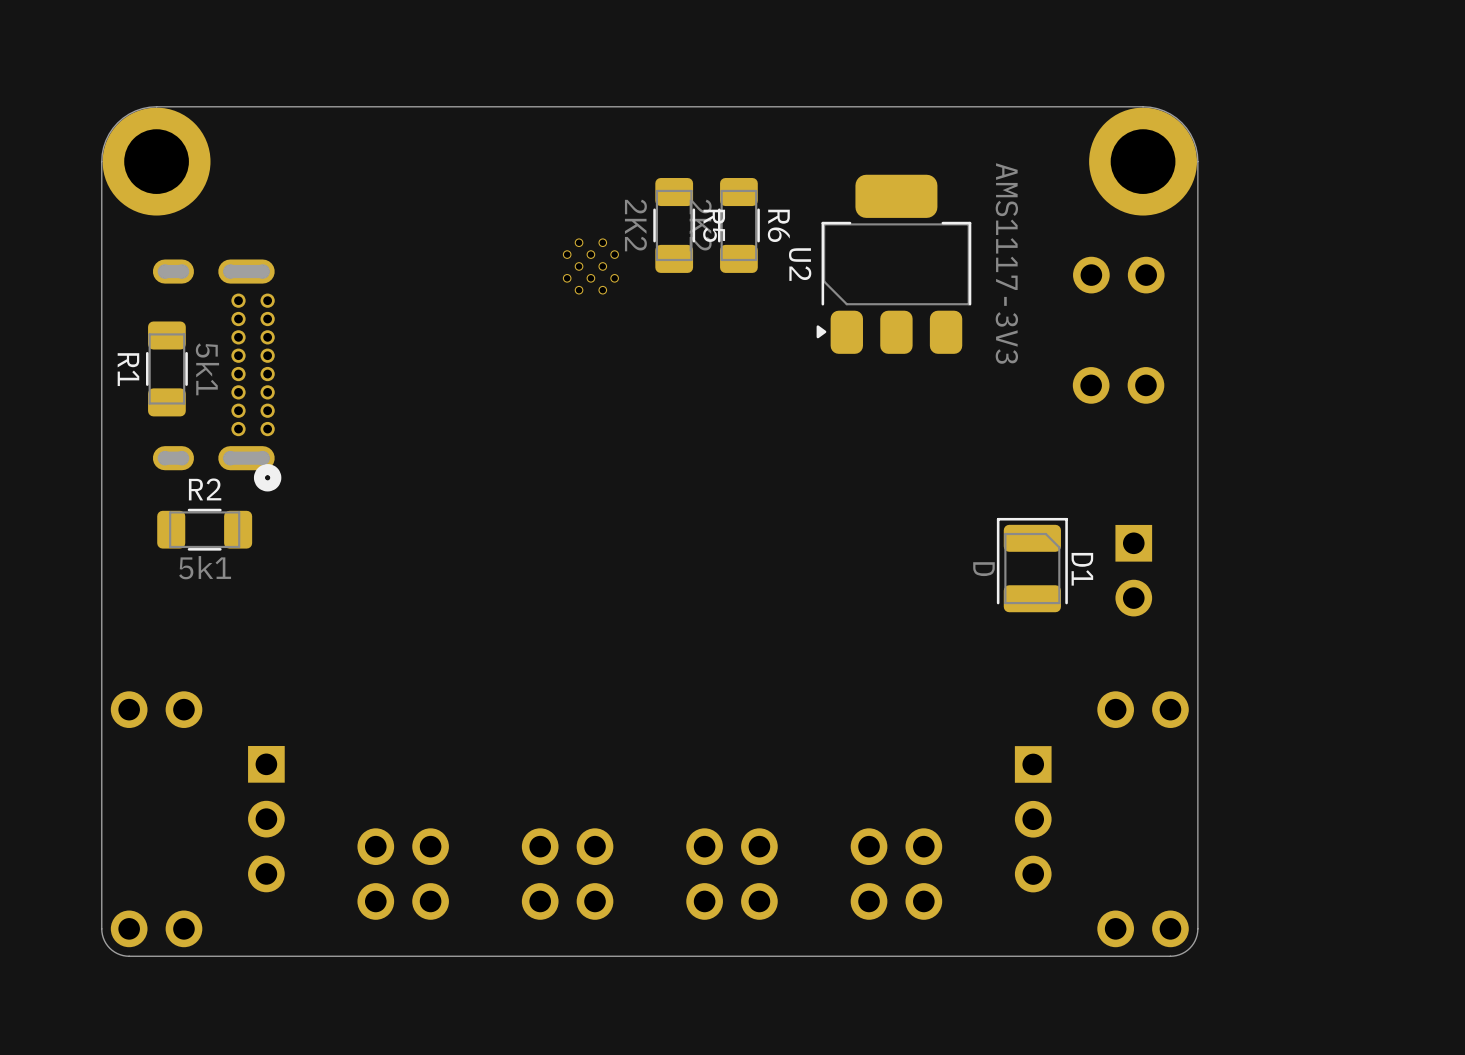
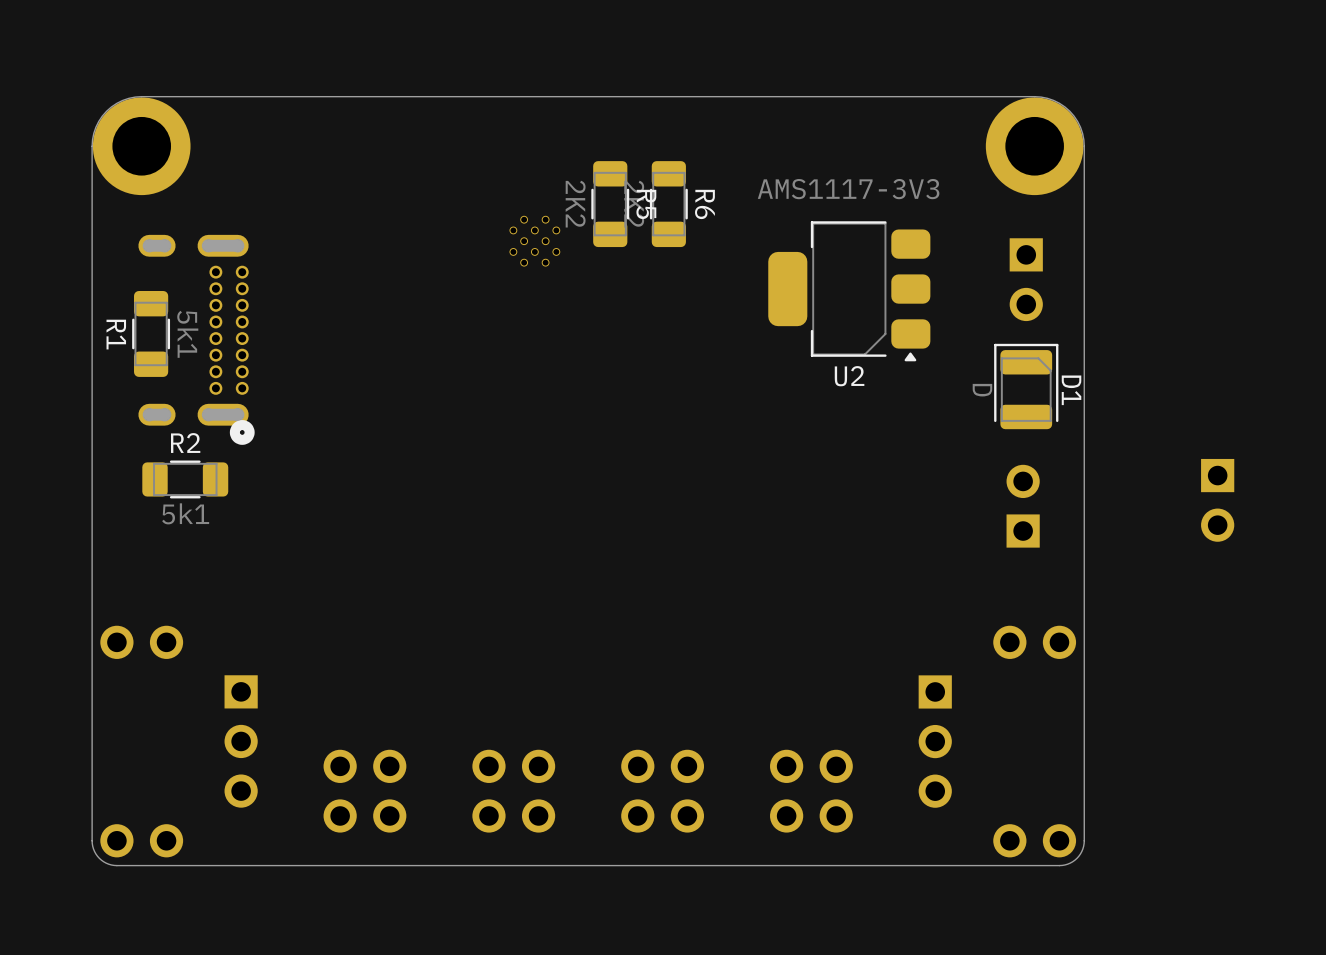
U2 rotation: 0° (893, 264) -> 90° counterclockwise (849, 291)
part: (1118, 275) -> none
part: none -> (1026, 279)
part: (1118, 385) -> none
part: none -> (1217, 500)
D1 position: (1032, 565) -> (1026, 386)
part rotation: 0° (1133, 570) -> 180° (1023, 506)

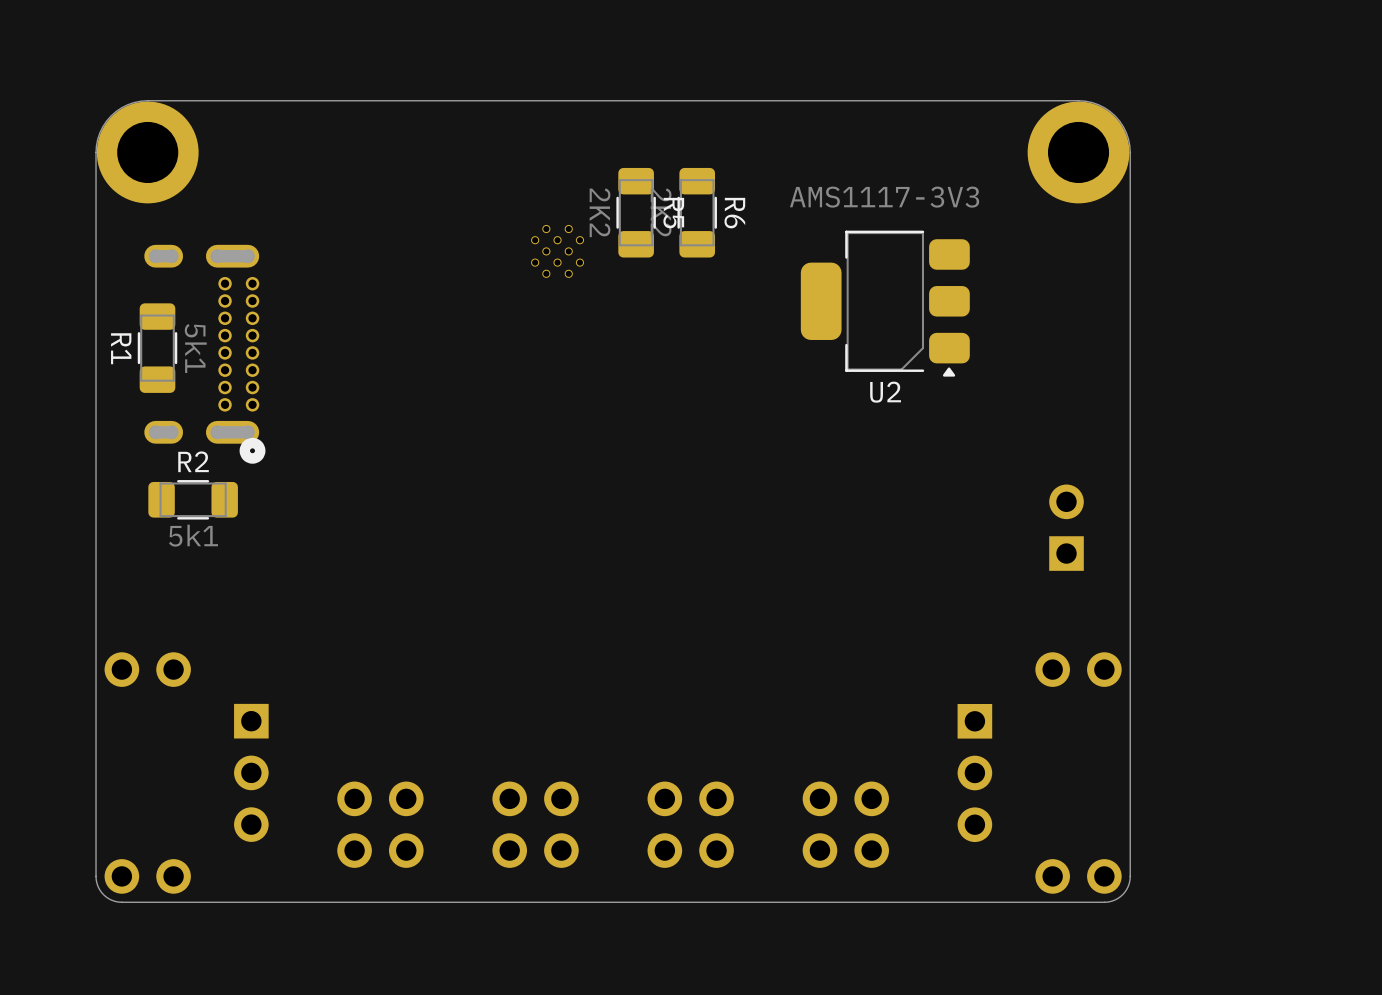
part: (1026, 279) -> none
D1: D (1026, 386) -> none
part: (1217, 500) -> none

